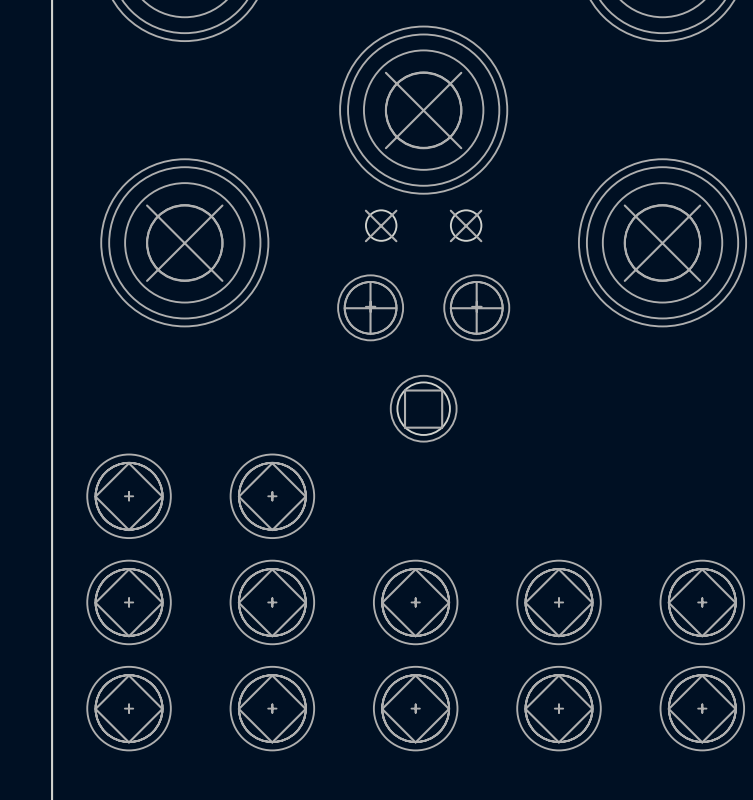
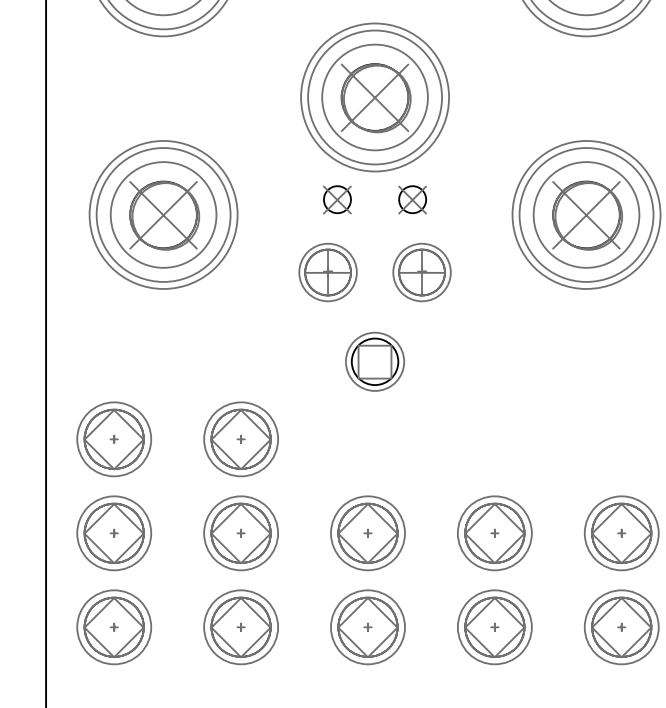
drawing: none -> [343, 64, 412, 134]
drawing: none -> [131, 182, 201, 251]
drawing: none -> [554, 182, 624, 251]

